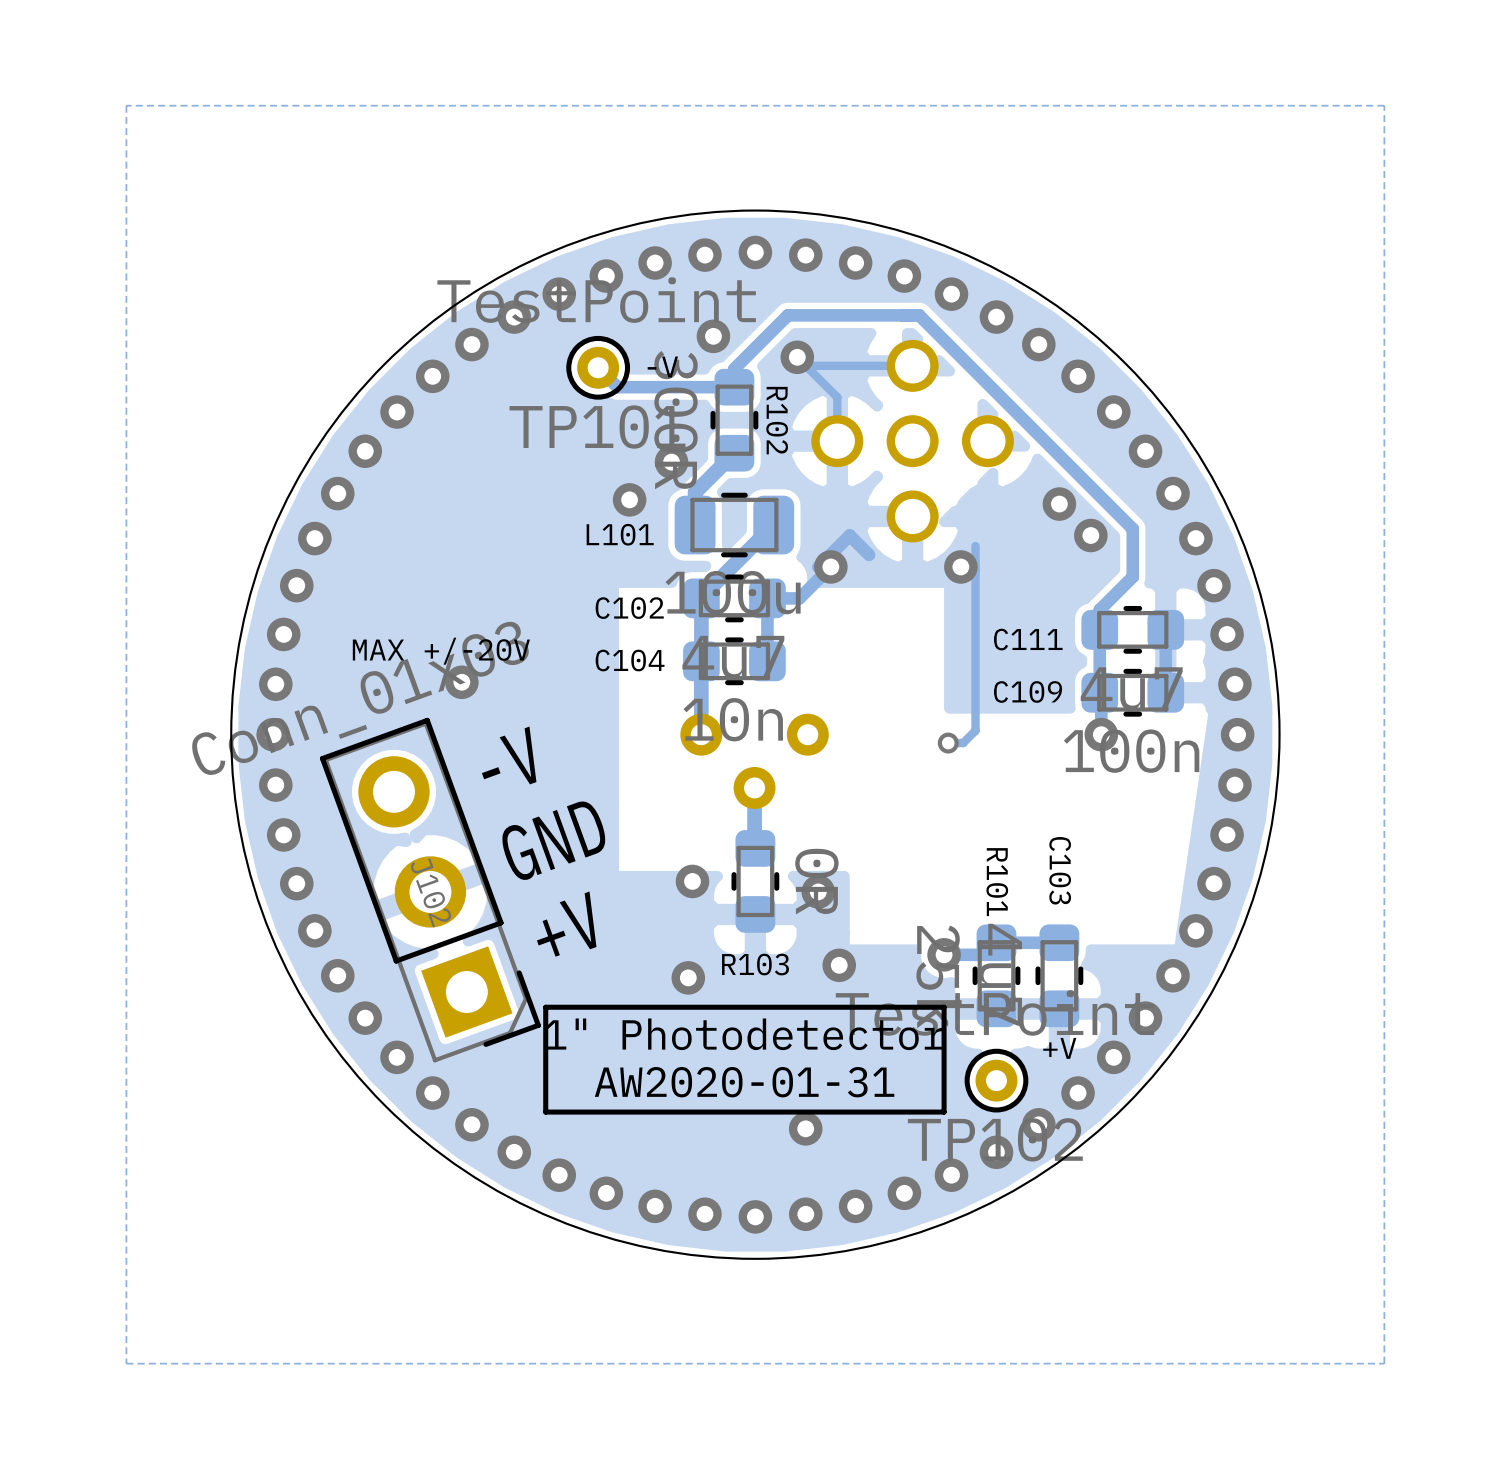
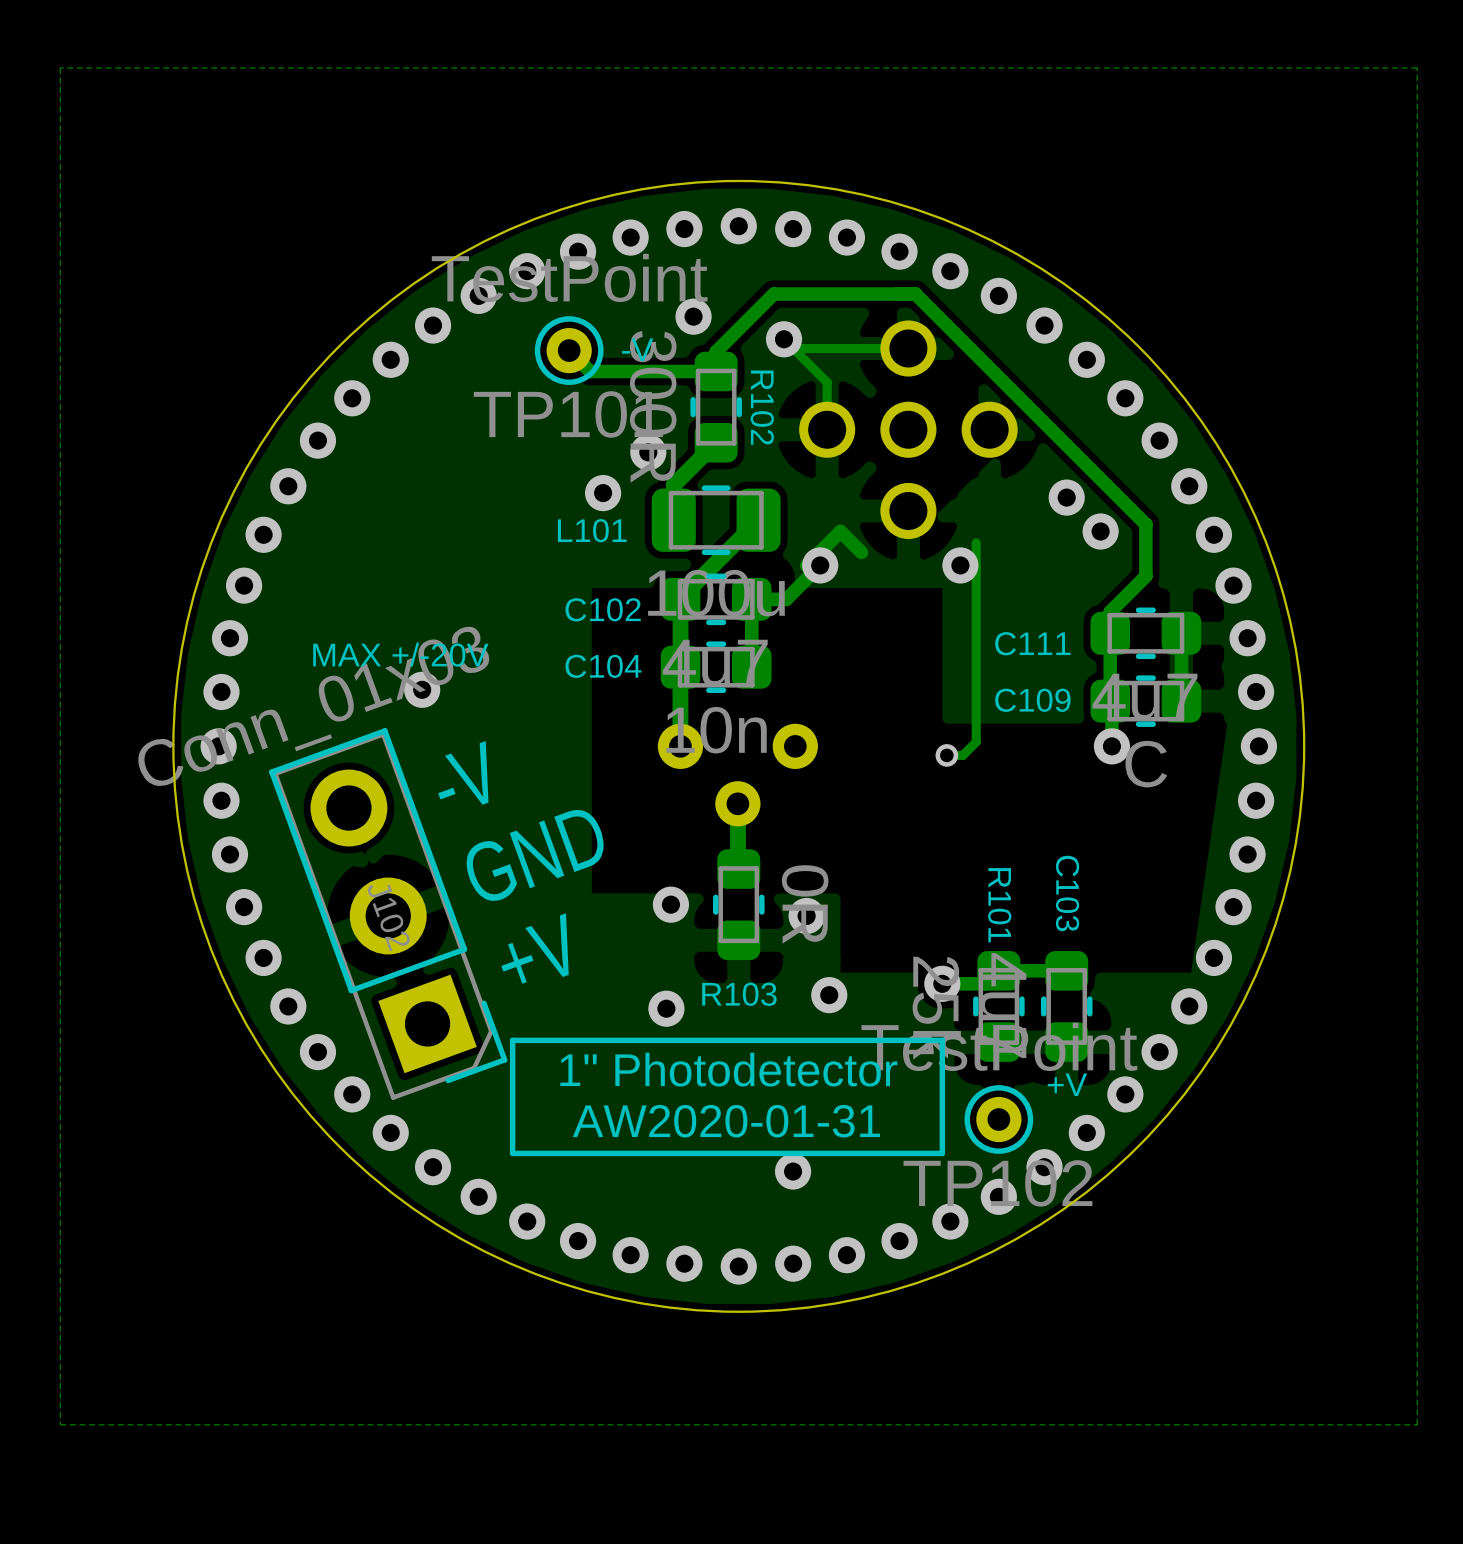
C109 value: 100n (1131, 751) -> C (1146, 764)

